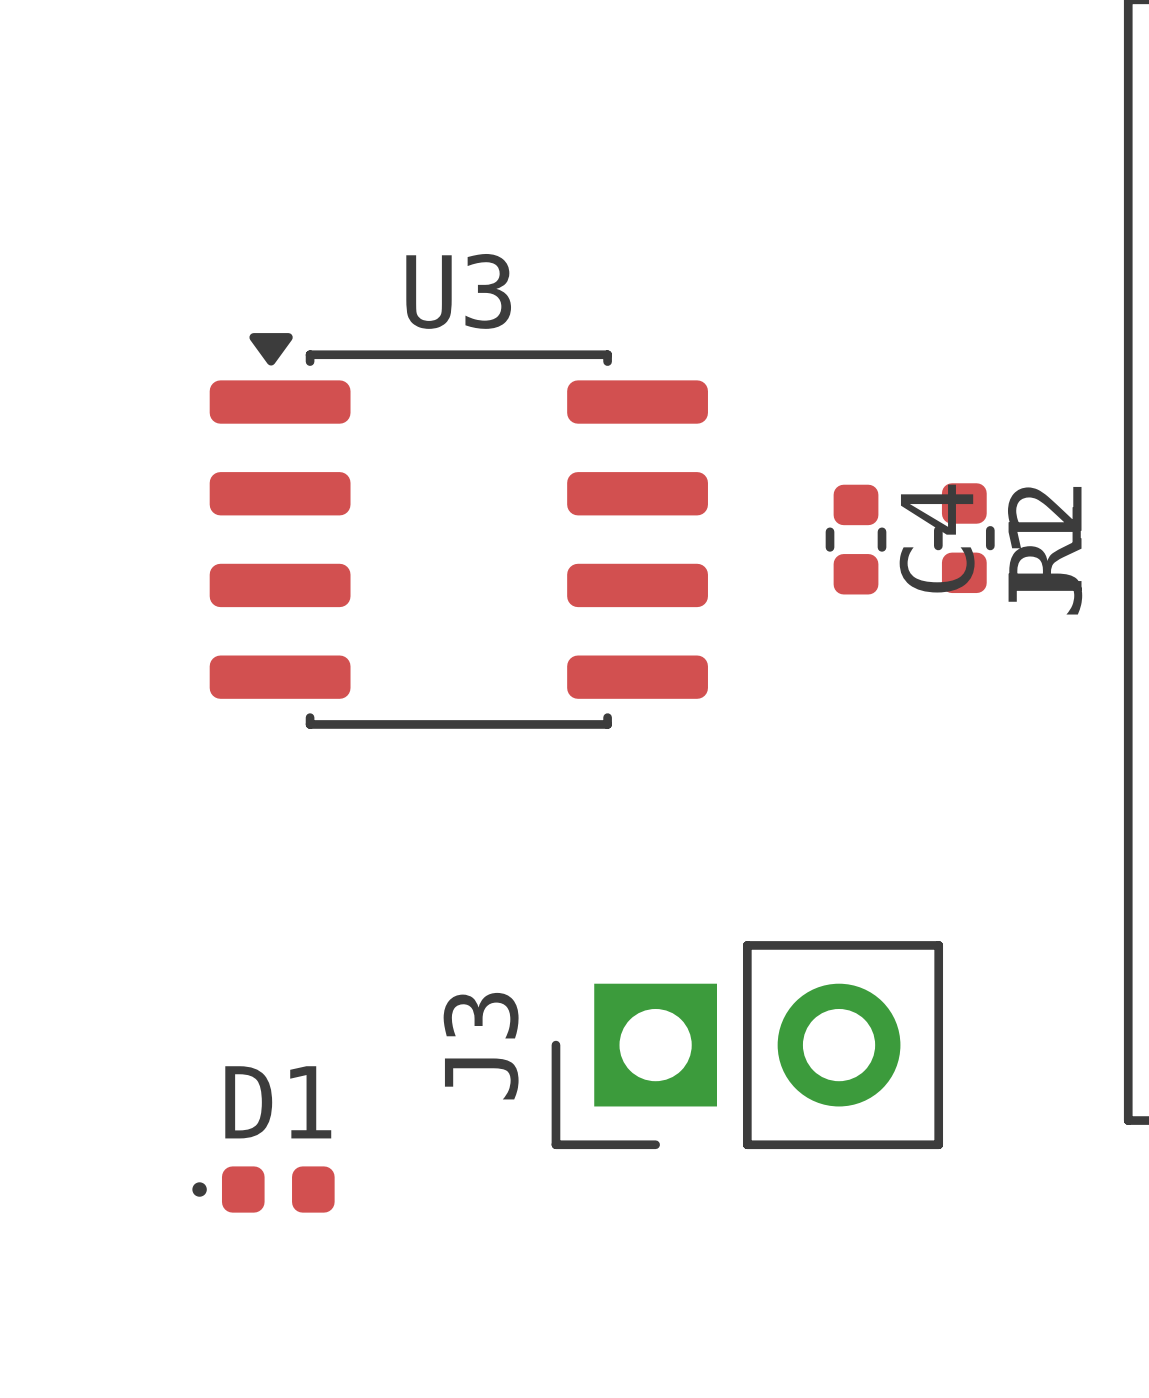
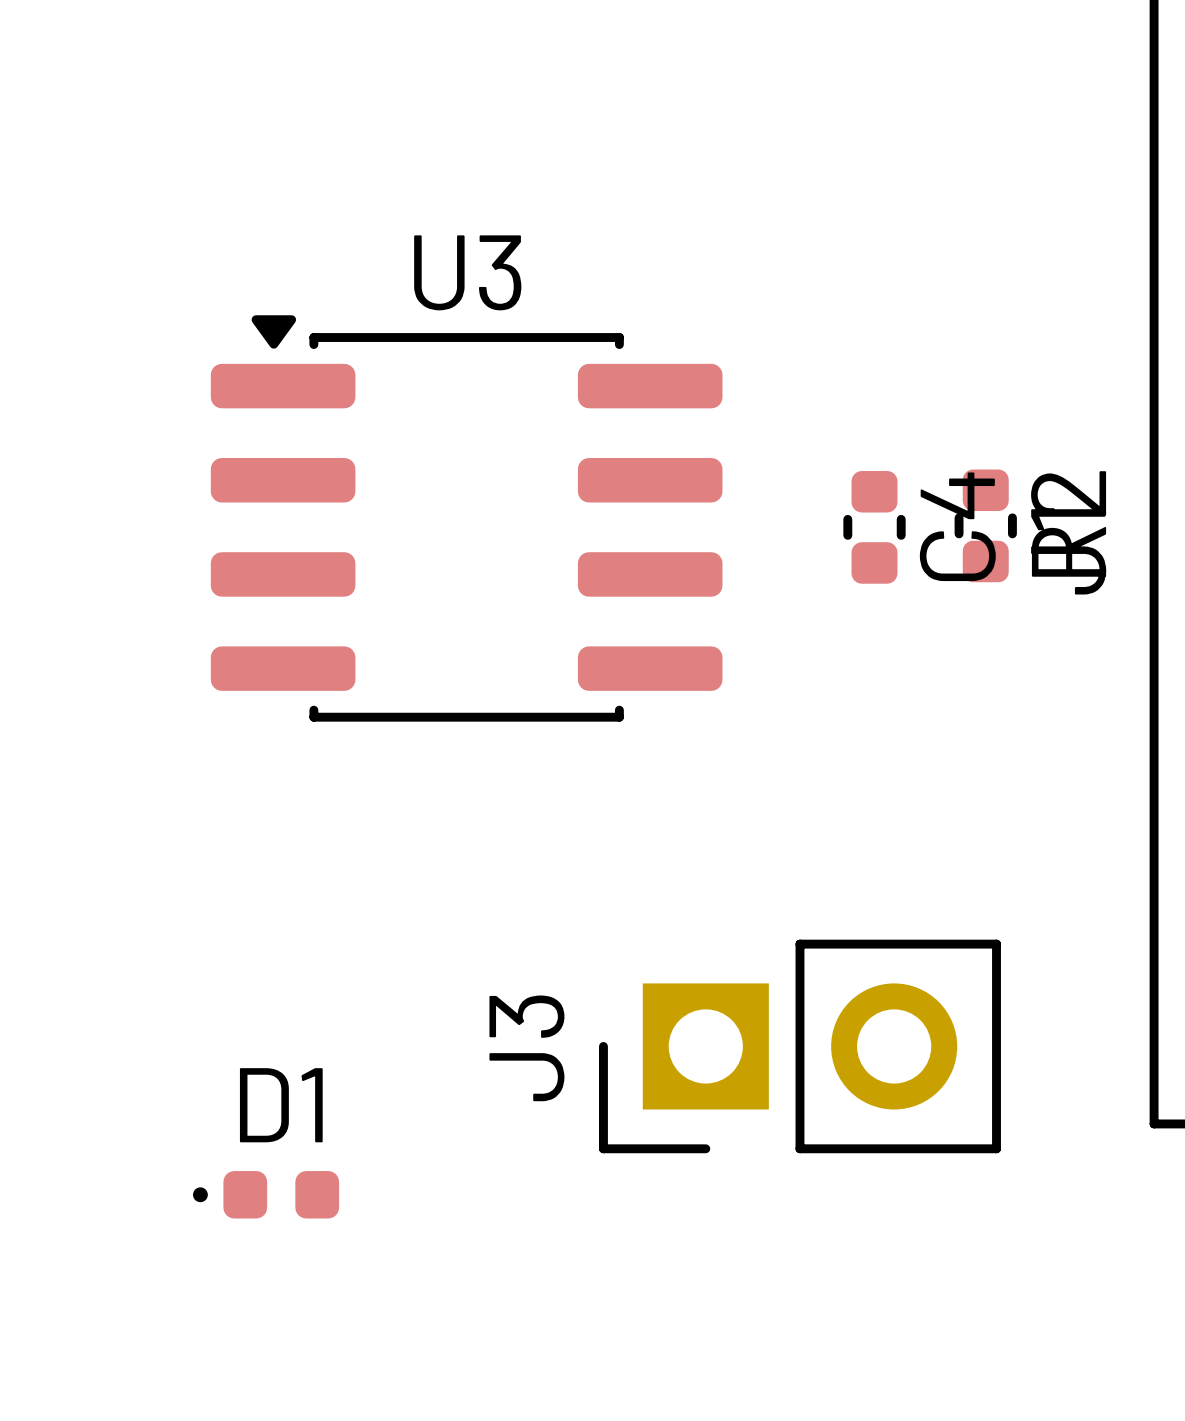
J3 position: (747, 1045) -> (799, 1046)

